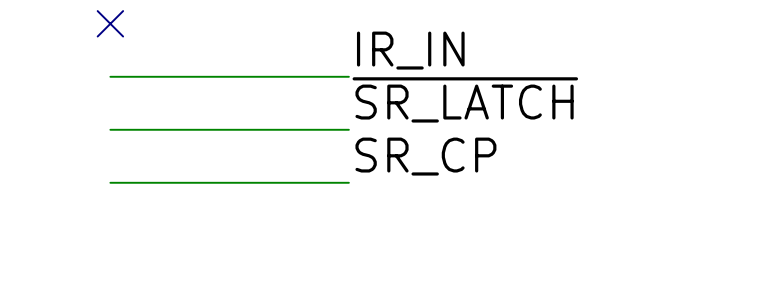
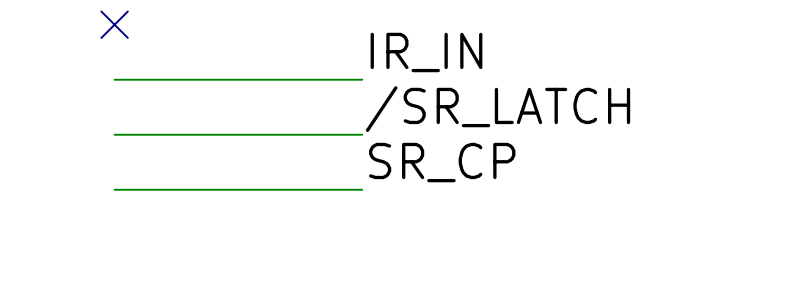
label: ~{SR_LATCH} (465, 99) -> /SR_LATCH (498, 109)

